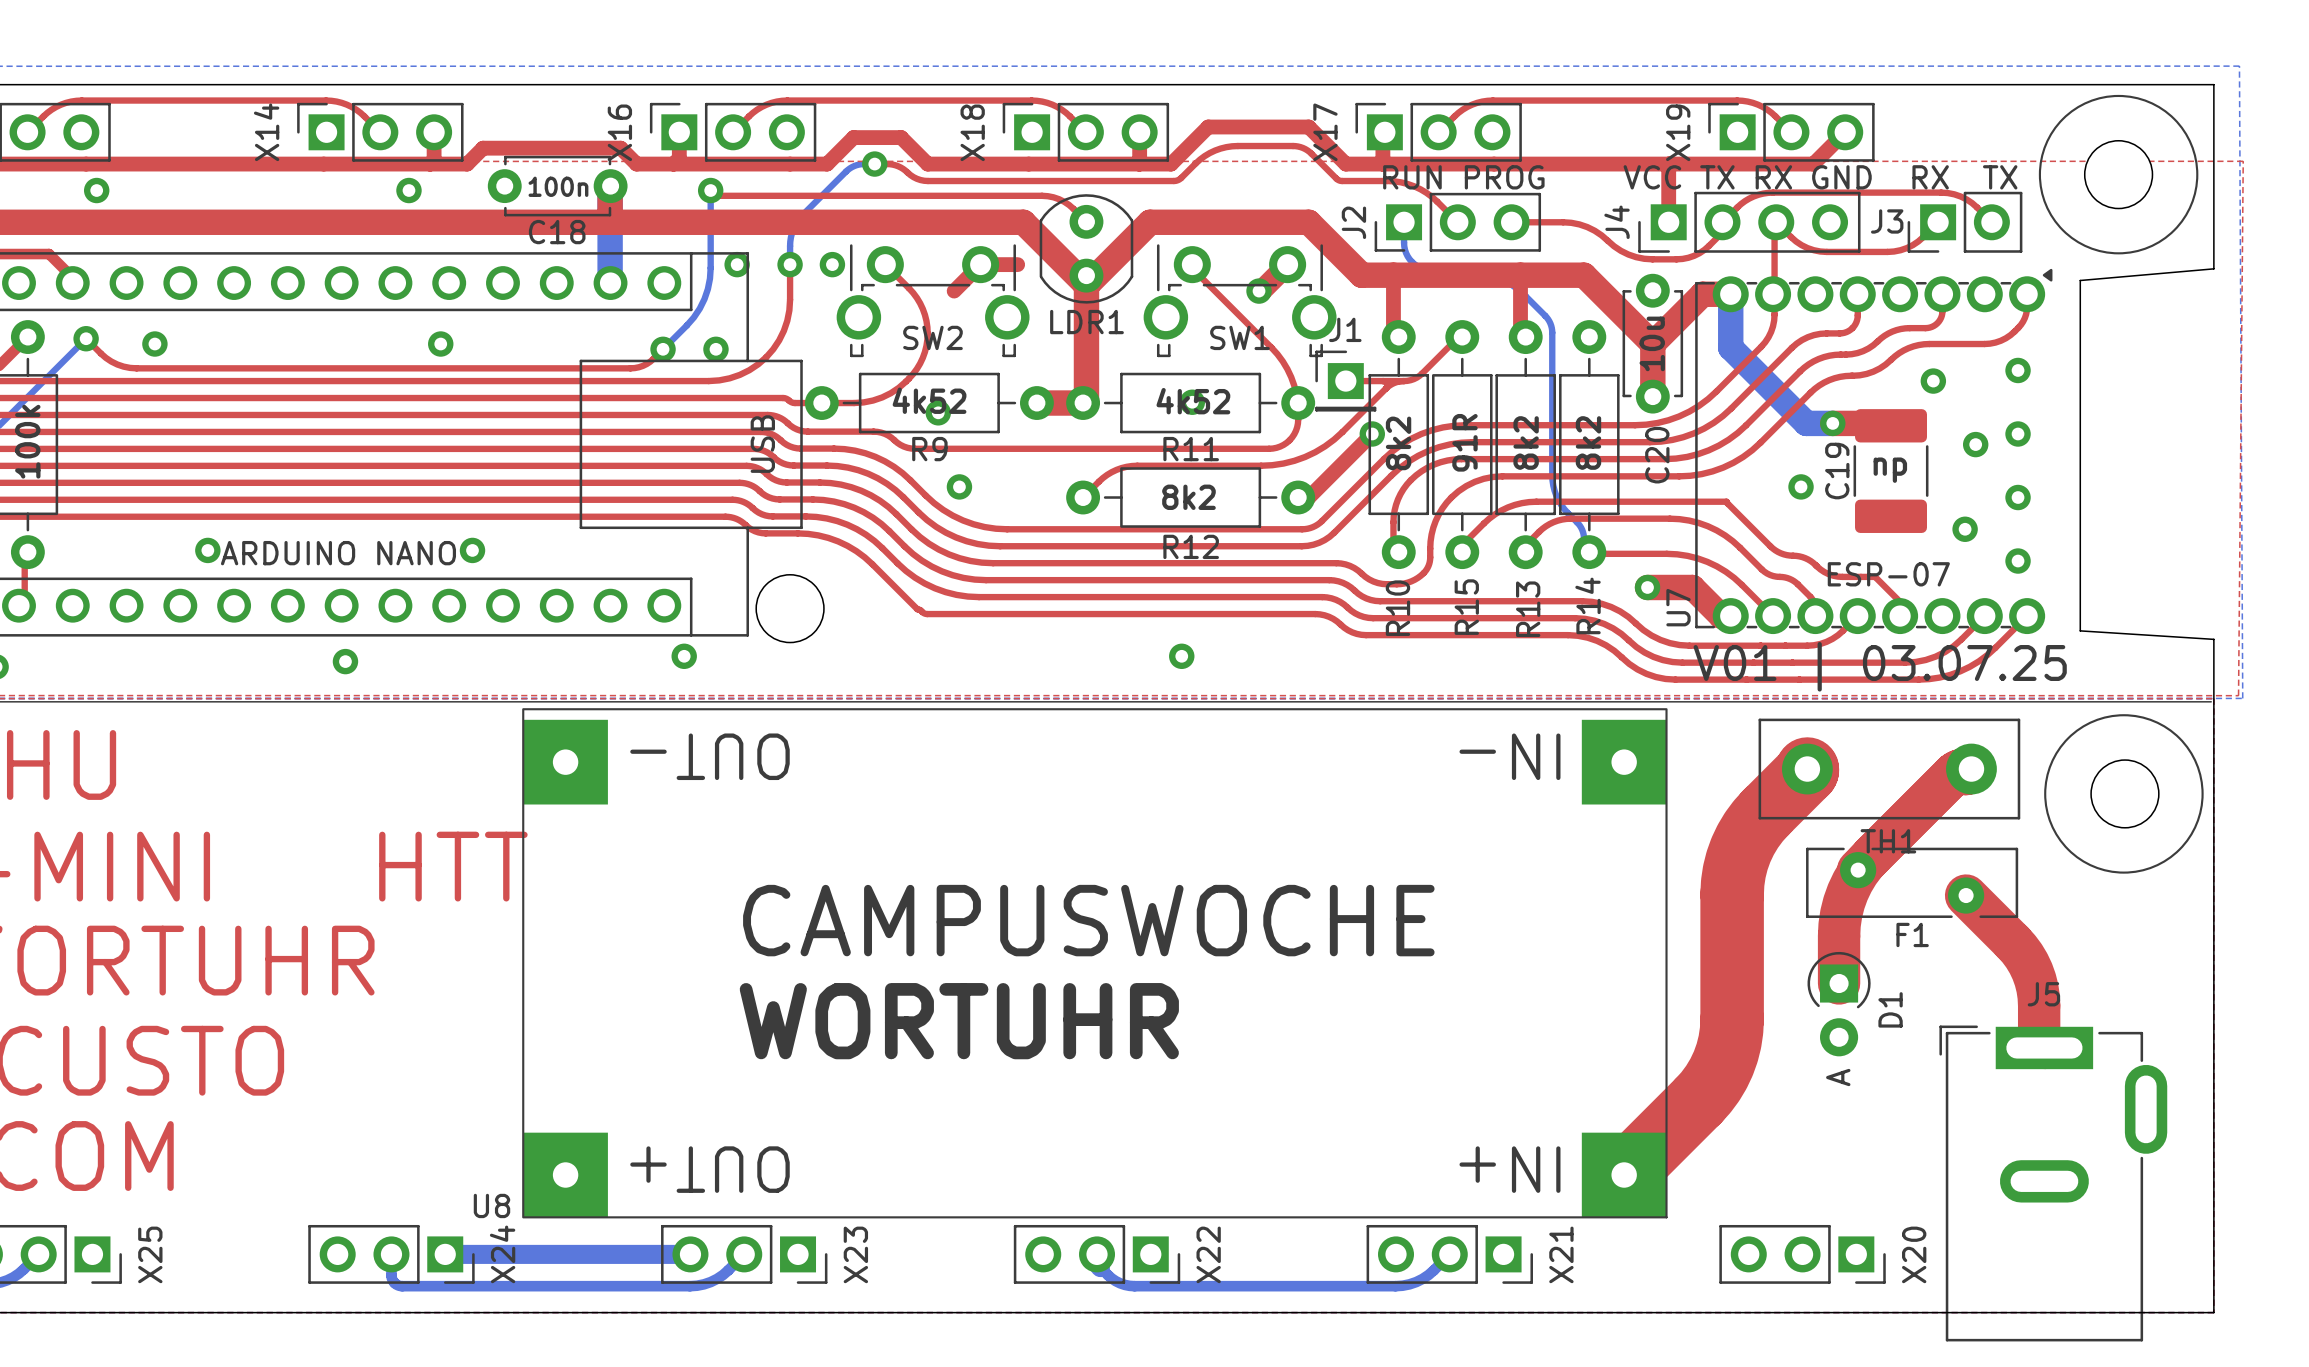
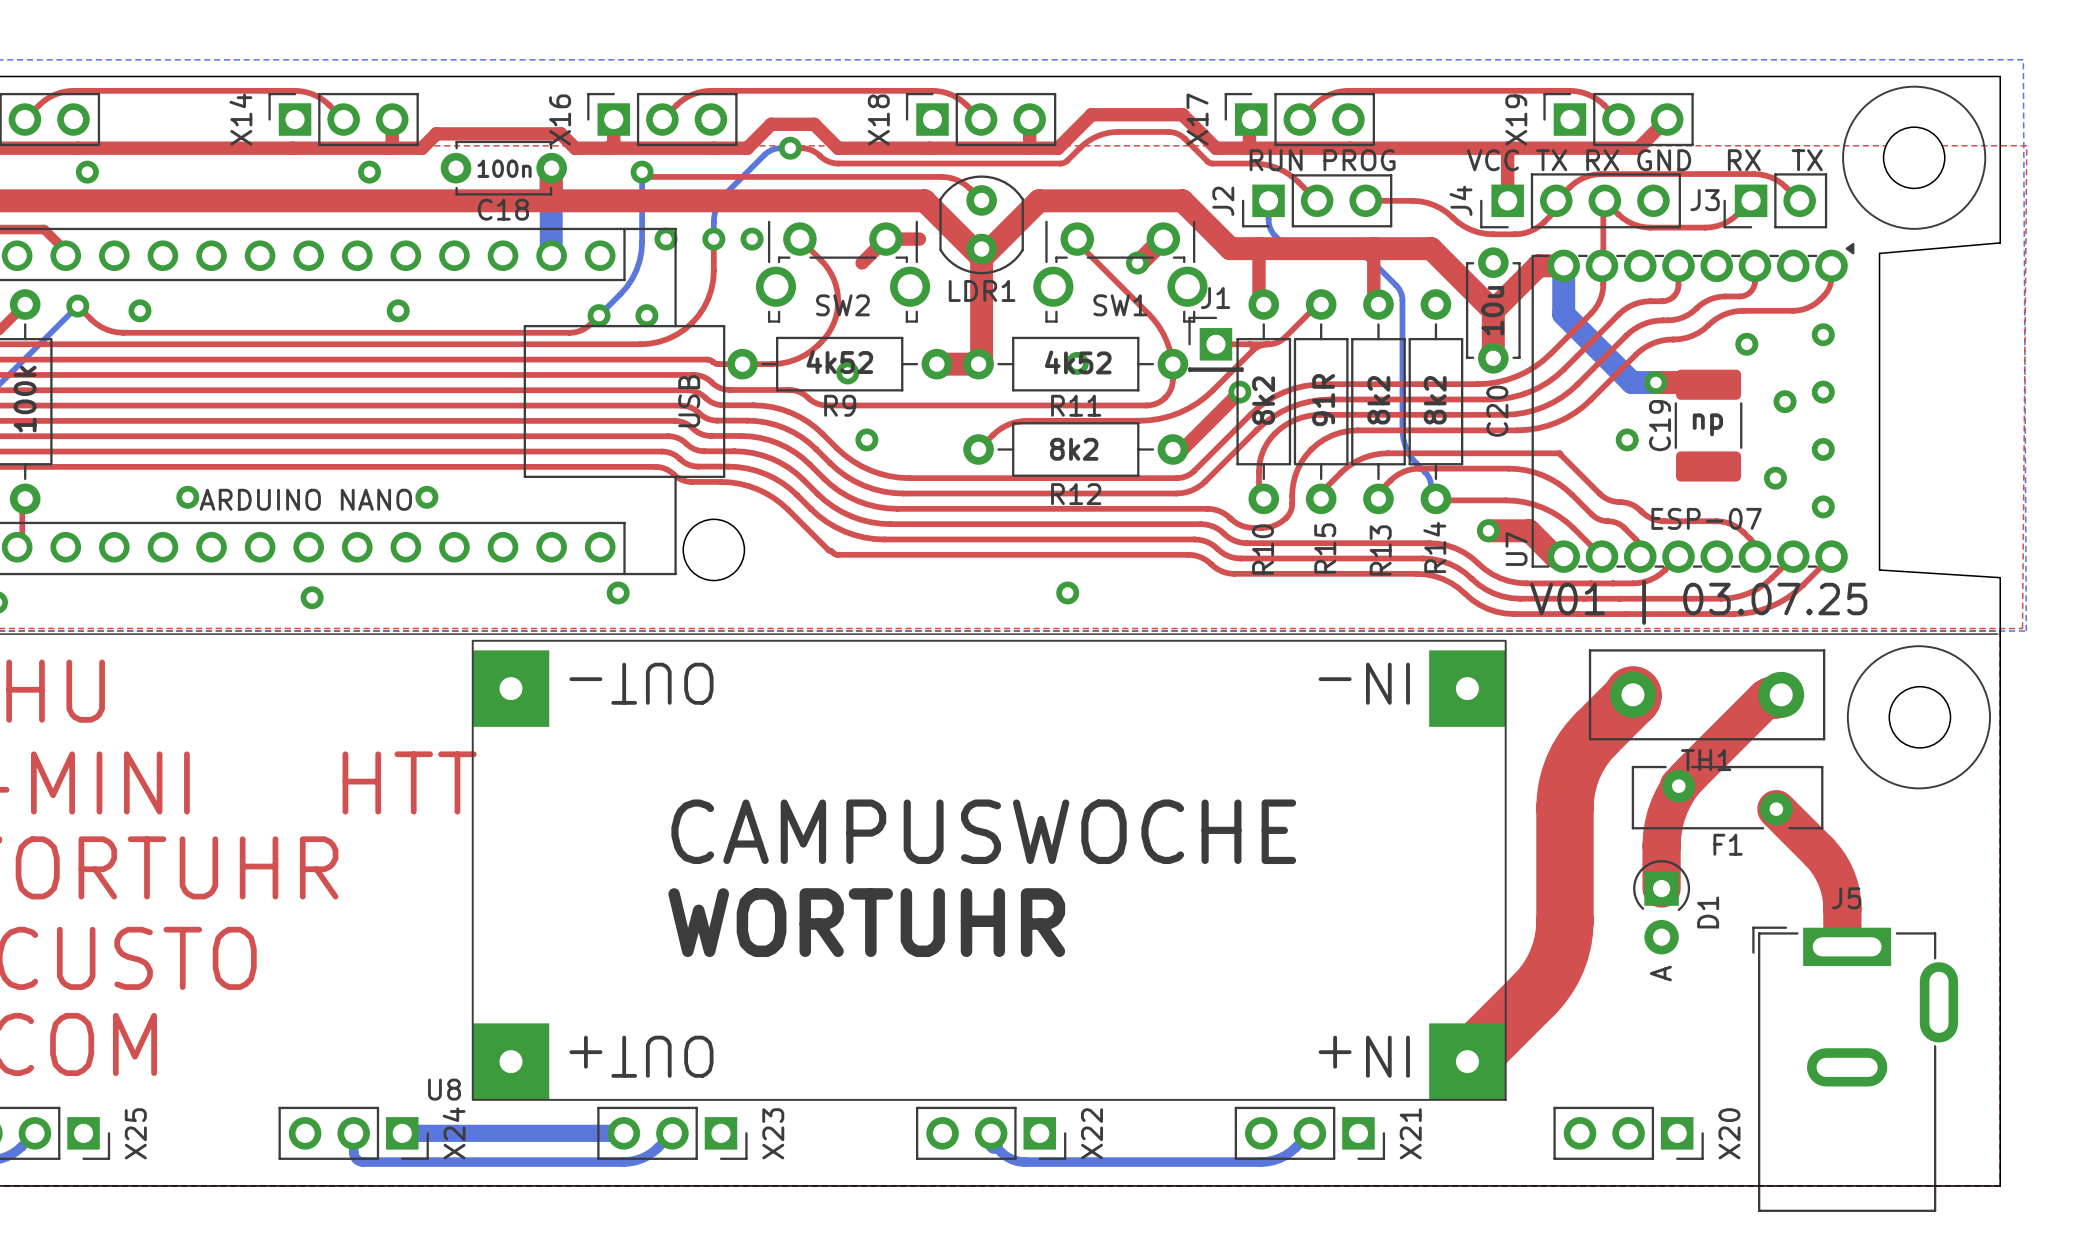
top track: (1875, 576) (1900, 601) (1900, 616) -> (1694, 521) (1721, 521) (1735, 526) (1752, 542) (1755, 556)

